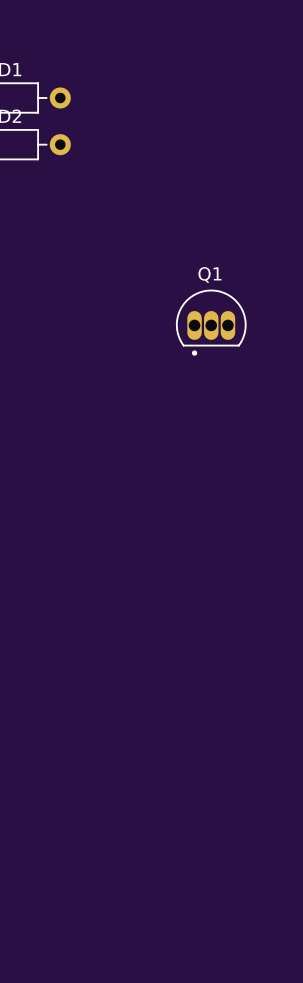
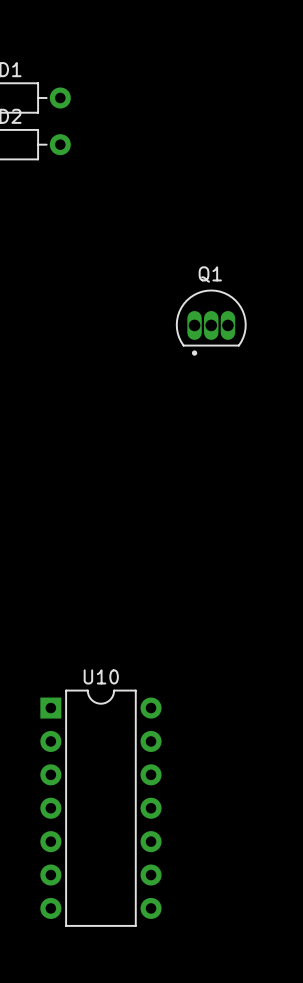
U10: none -> (100, 808)

